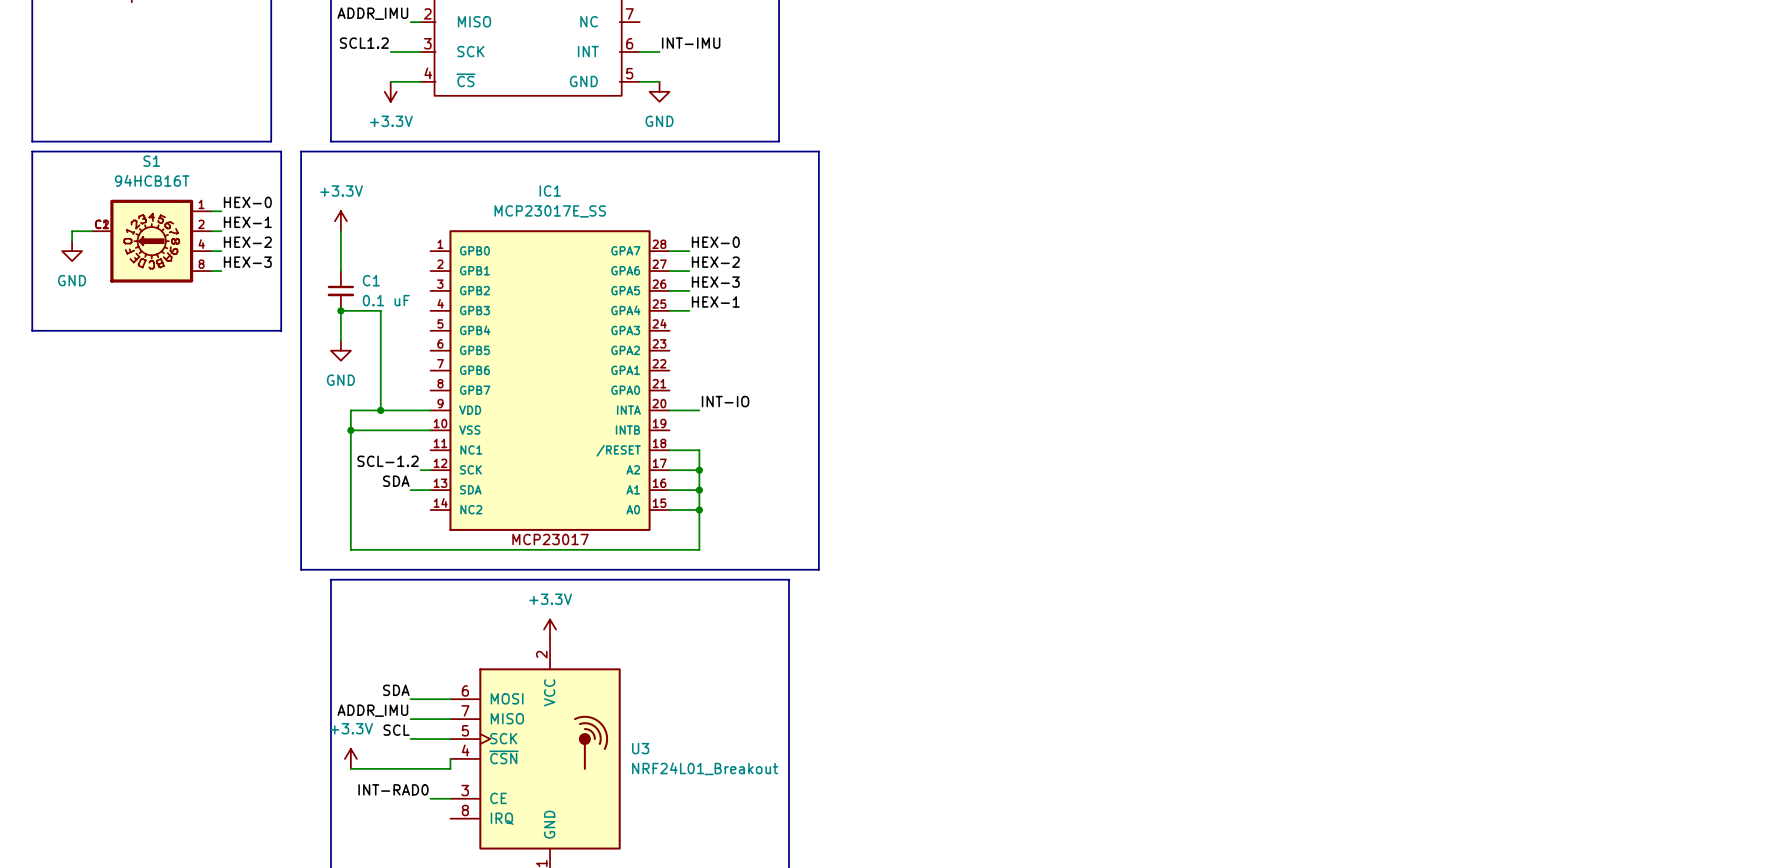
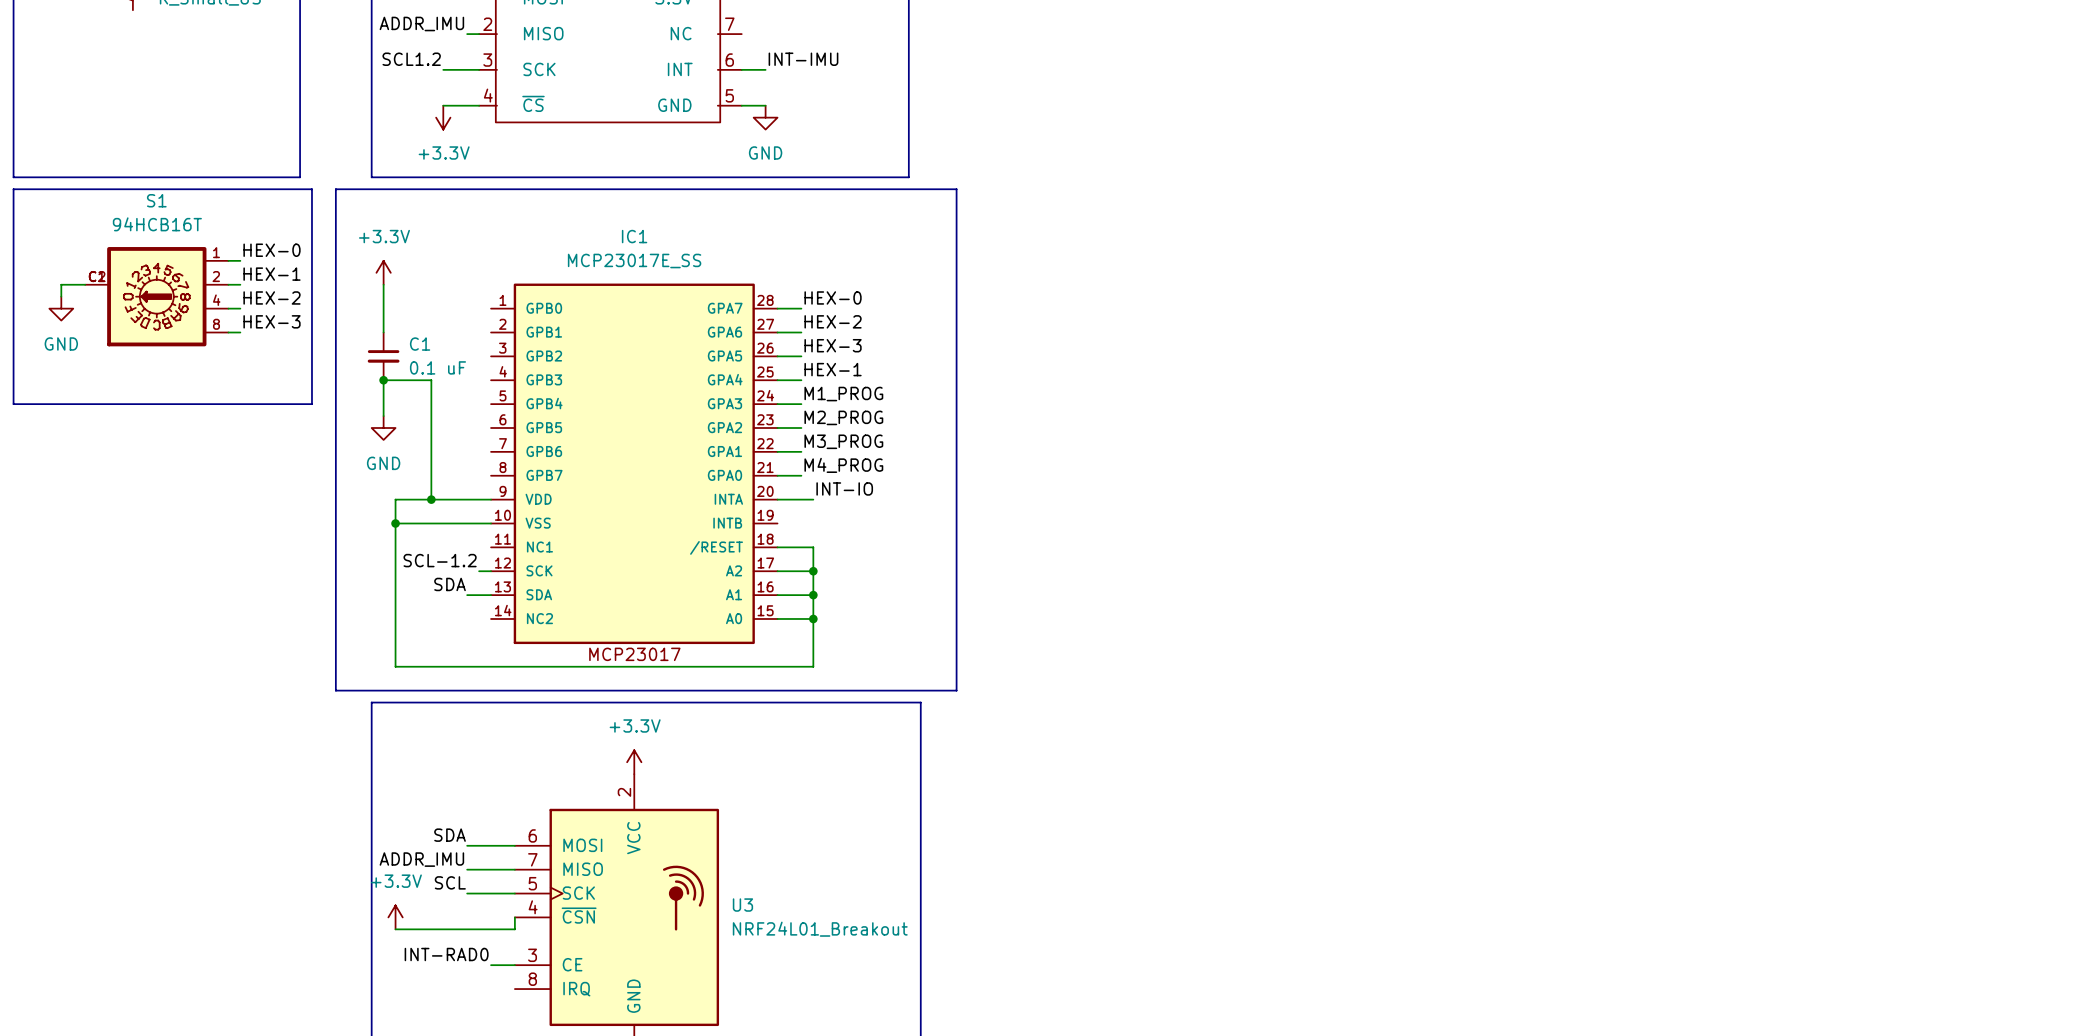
label: none -> M1_PROG (843, 394)
wire: none -> (777, 404) (801, 404)
label: none -> M2_PROG (843, 417)
wire: none -> (777, 428) (801, 428)
label: none -> M3_PROG (843, 441)
wire: none -> (777, 451) (801, 451)
label: none -> M4_PROG (843, 465)
wire: none -> (777, 475) (801, 475)

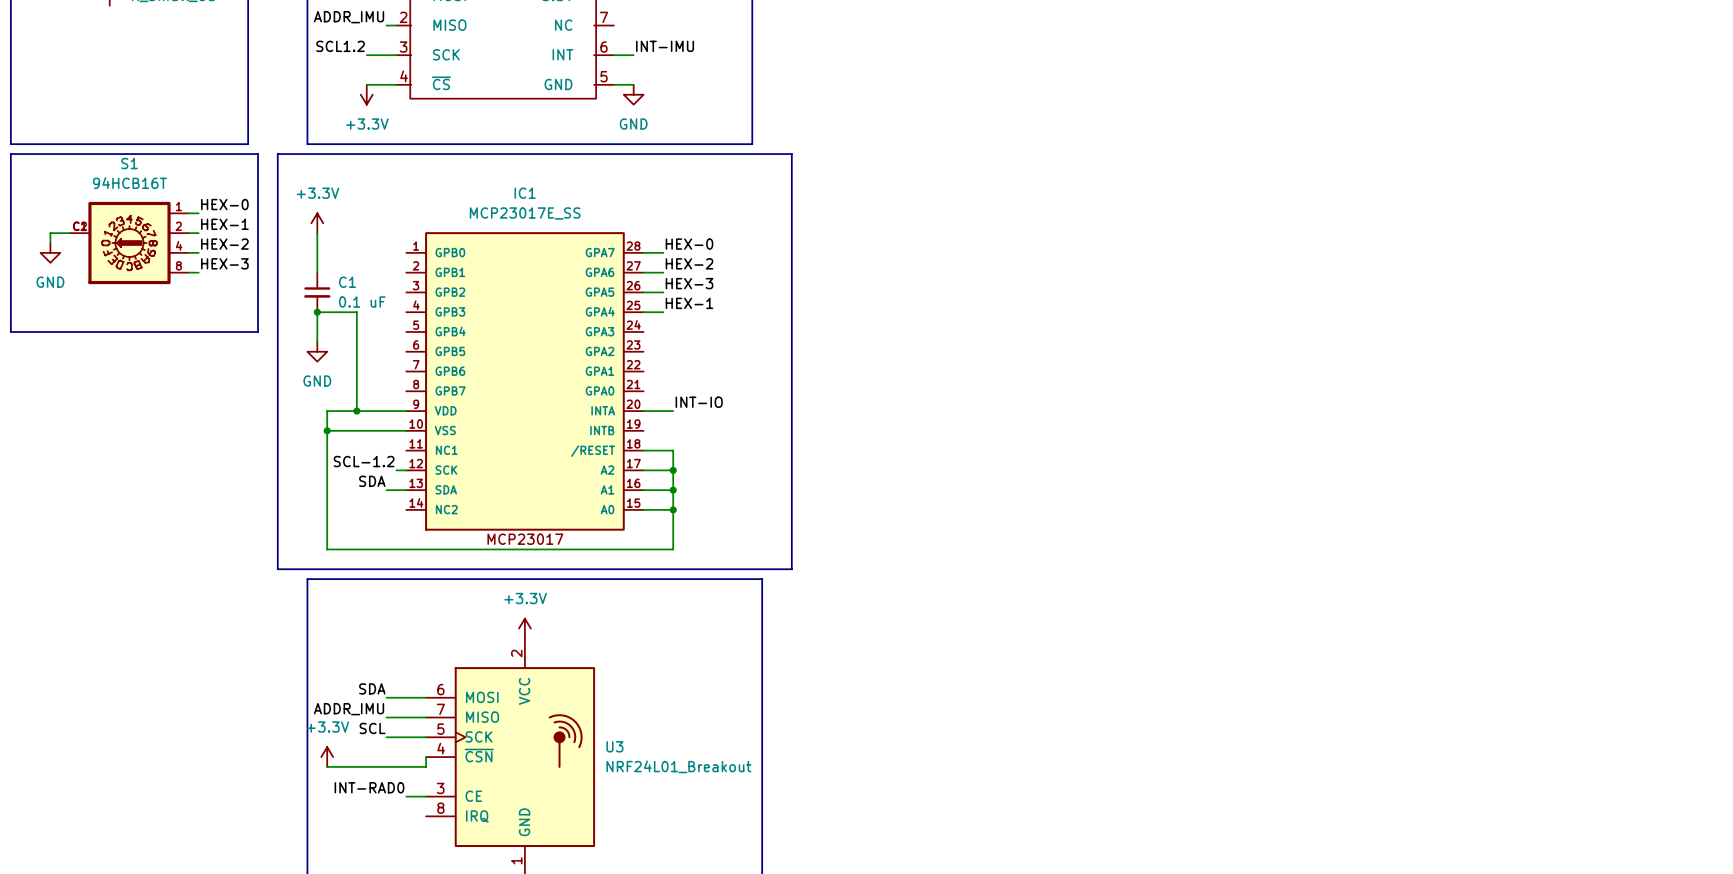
label: M1_PROG (843, 394) -> none
wire: (777, 404) (801, 404) -> none
label: M2_PROG (843, 417) -> none
wire: (777, 428) (801, 428) -> none
label: M3_PROG (843, 441) -> none
wire: (777, 451) (801, 451) -> none
label: M4_PROG (843, 465) -> none
wire: (777, 475) (801, 475) -> none

